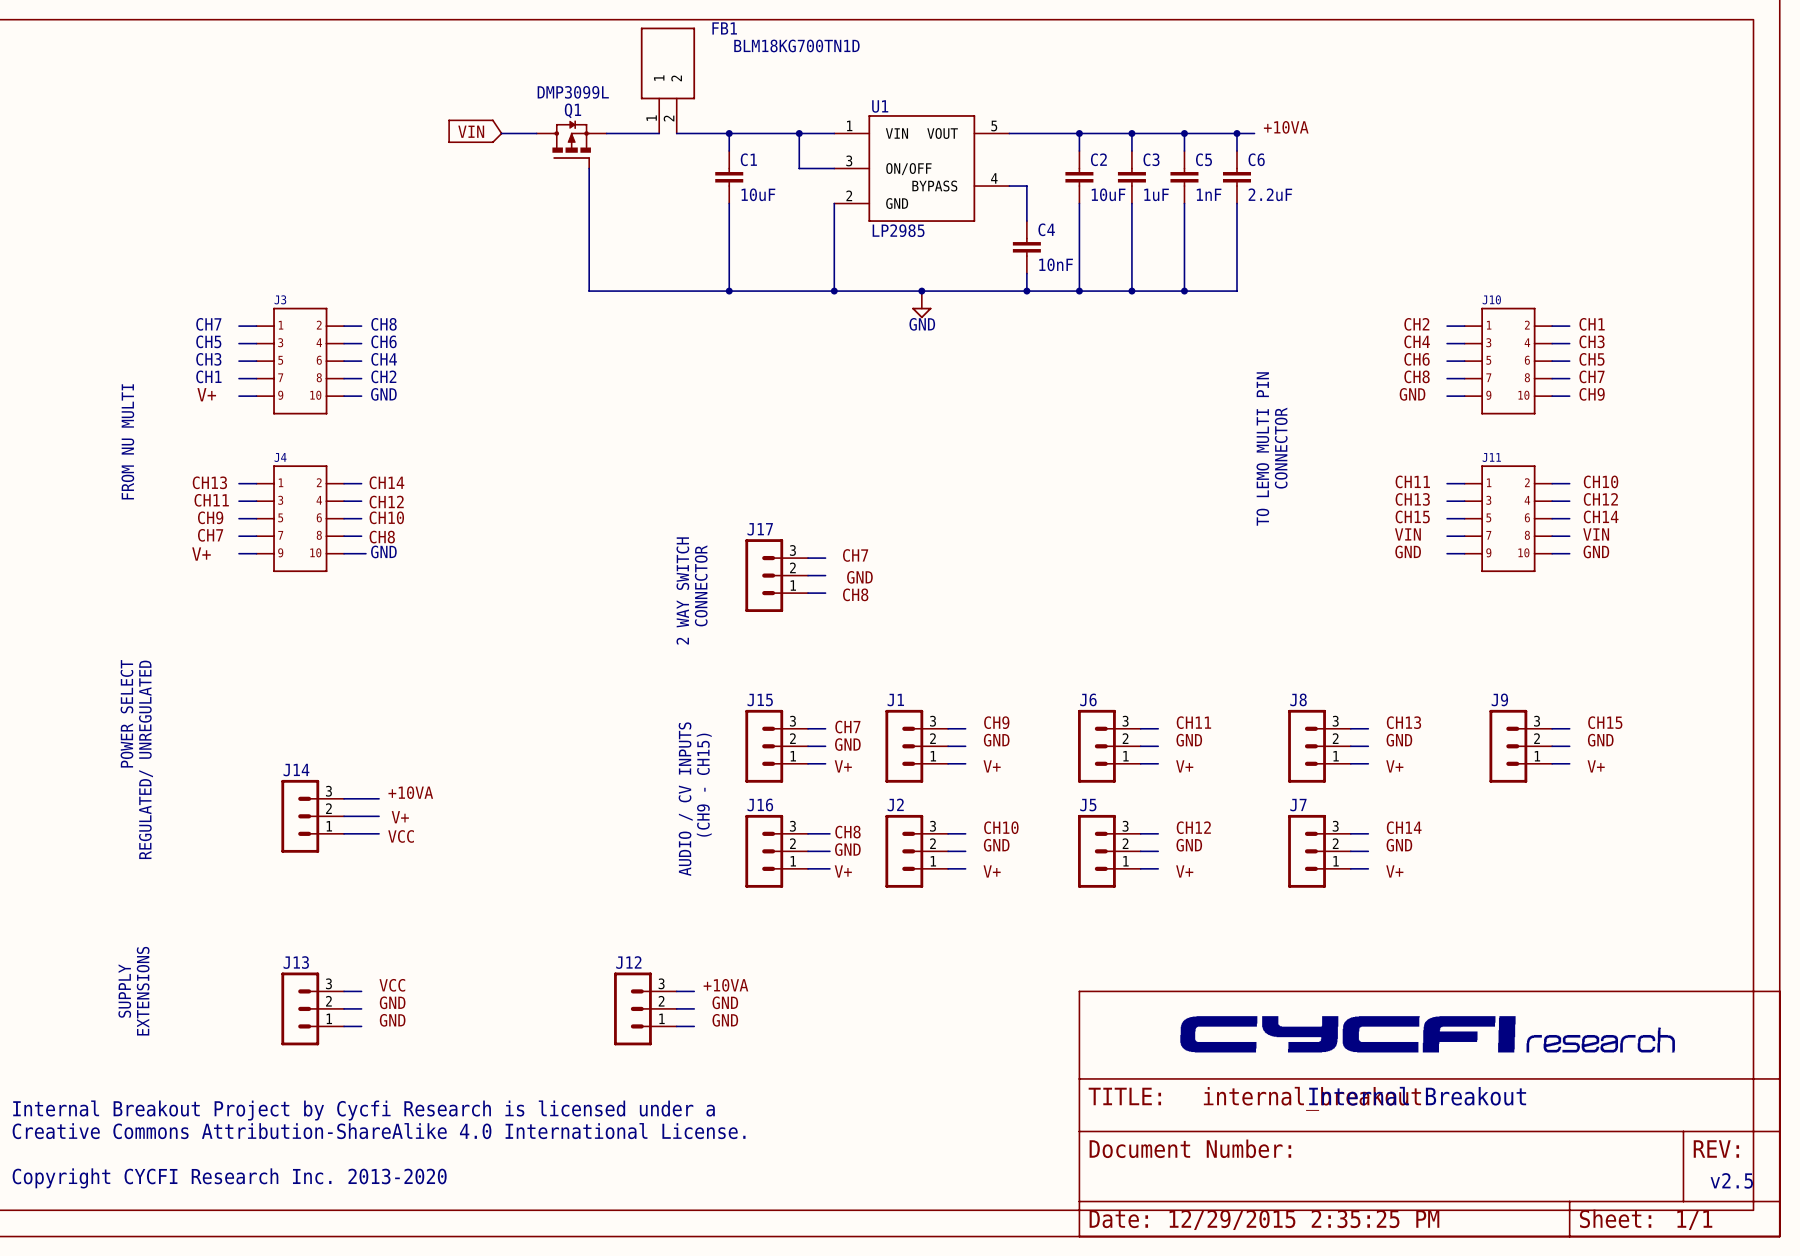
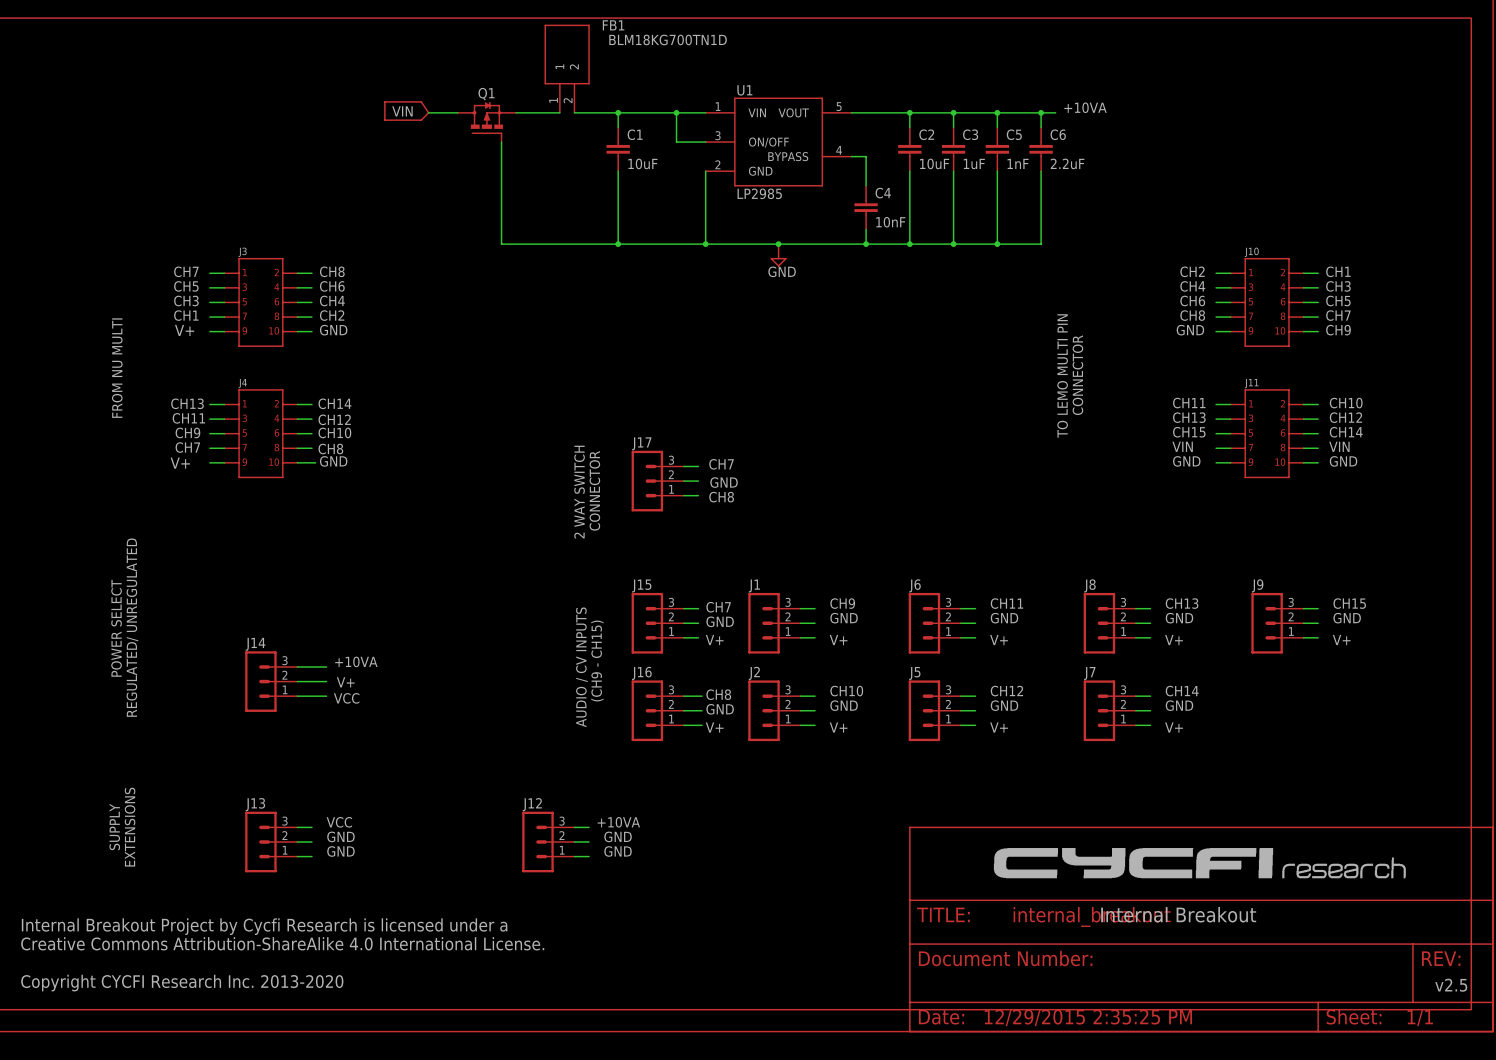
text: DMP3099L (573, 92) -> none

